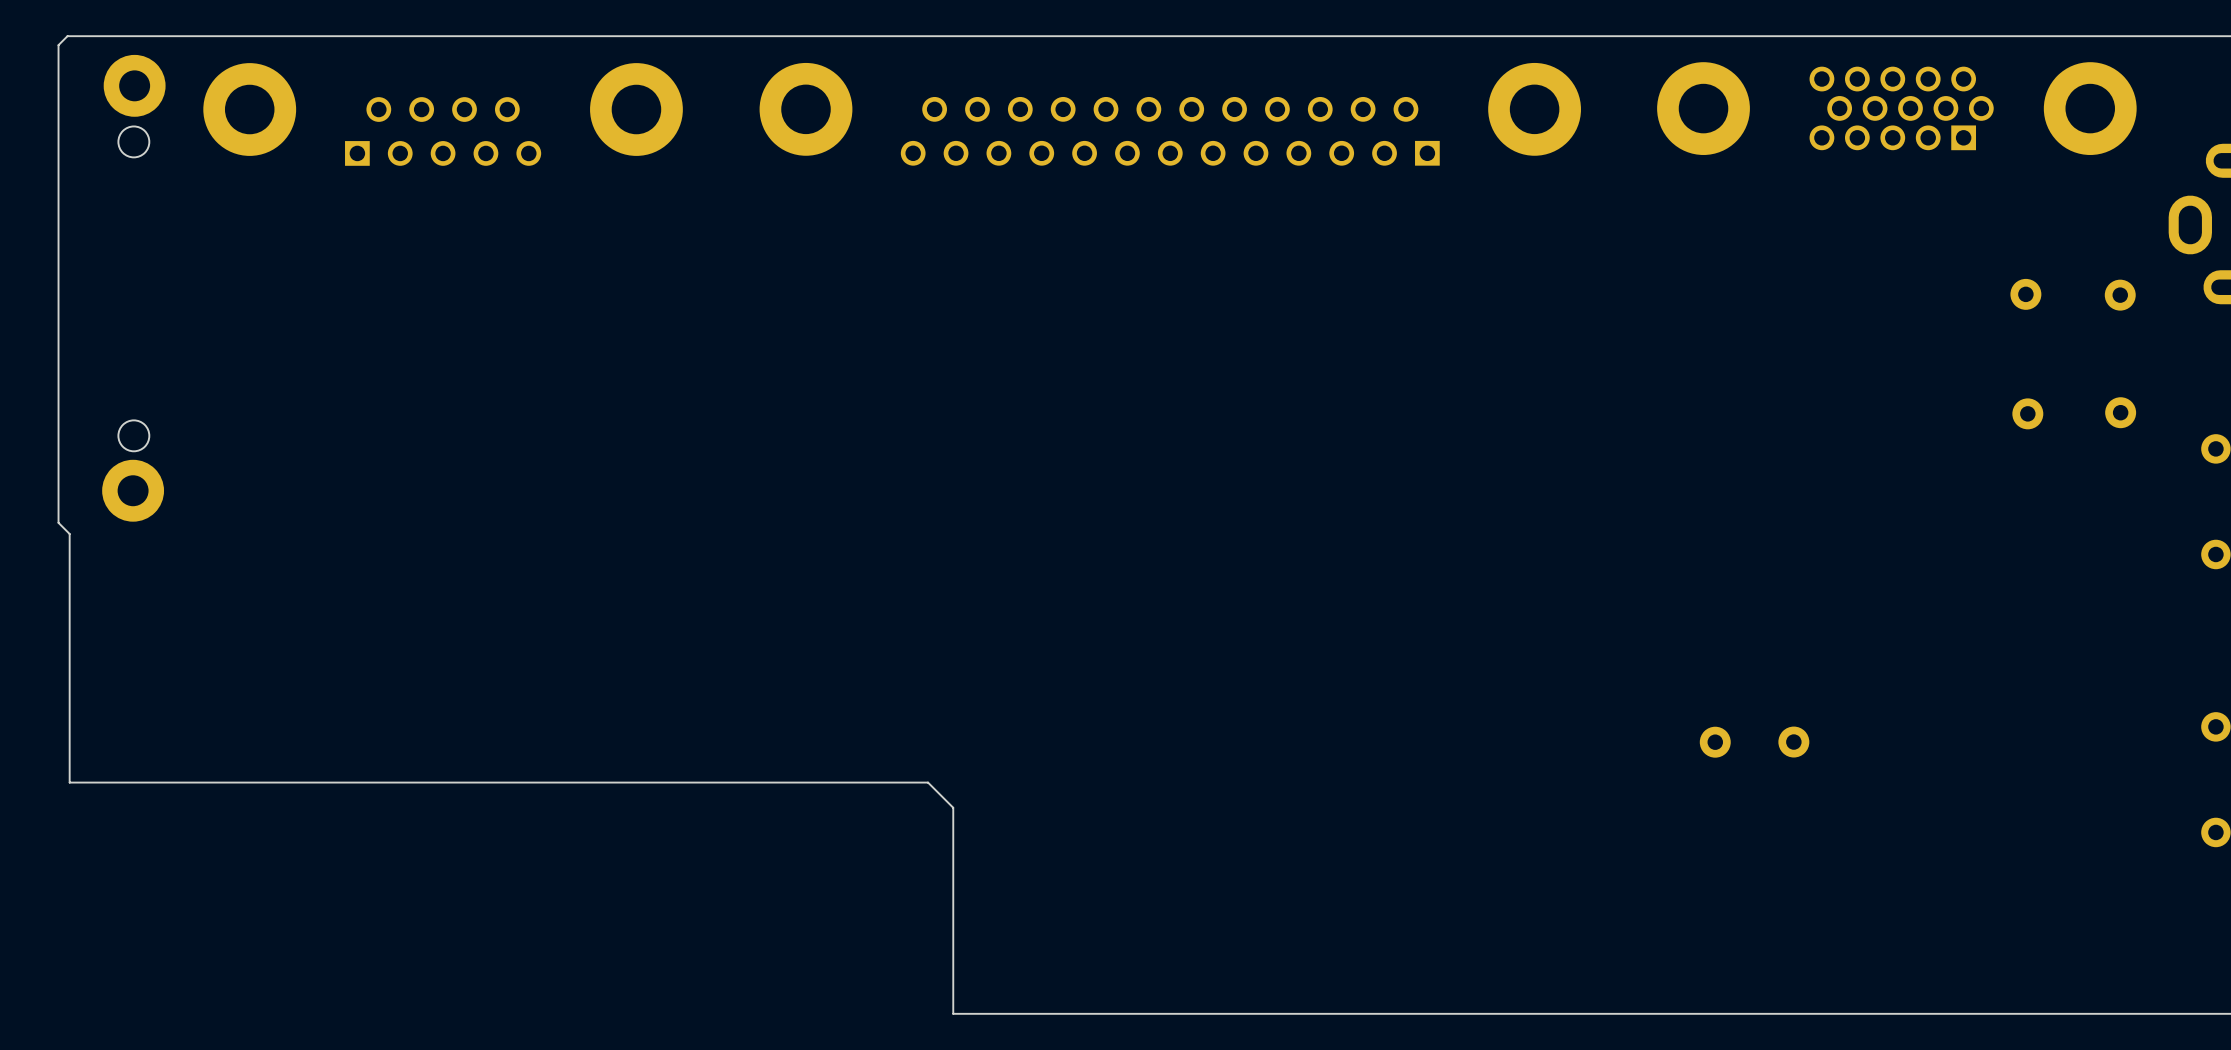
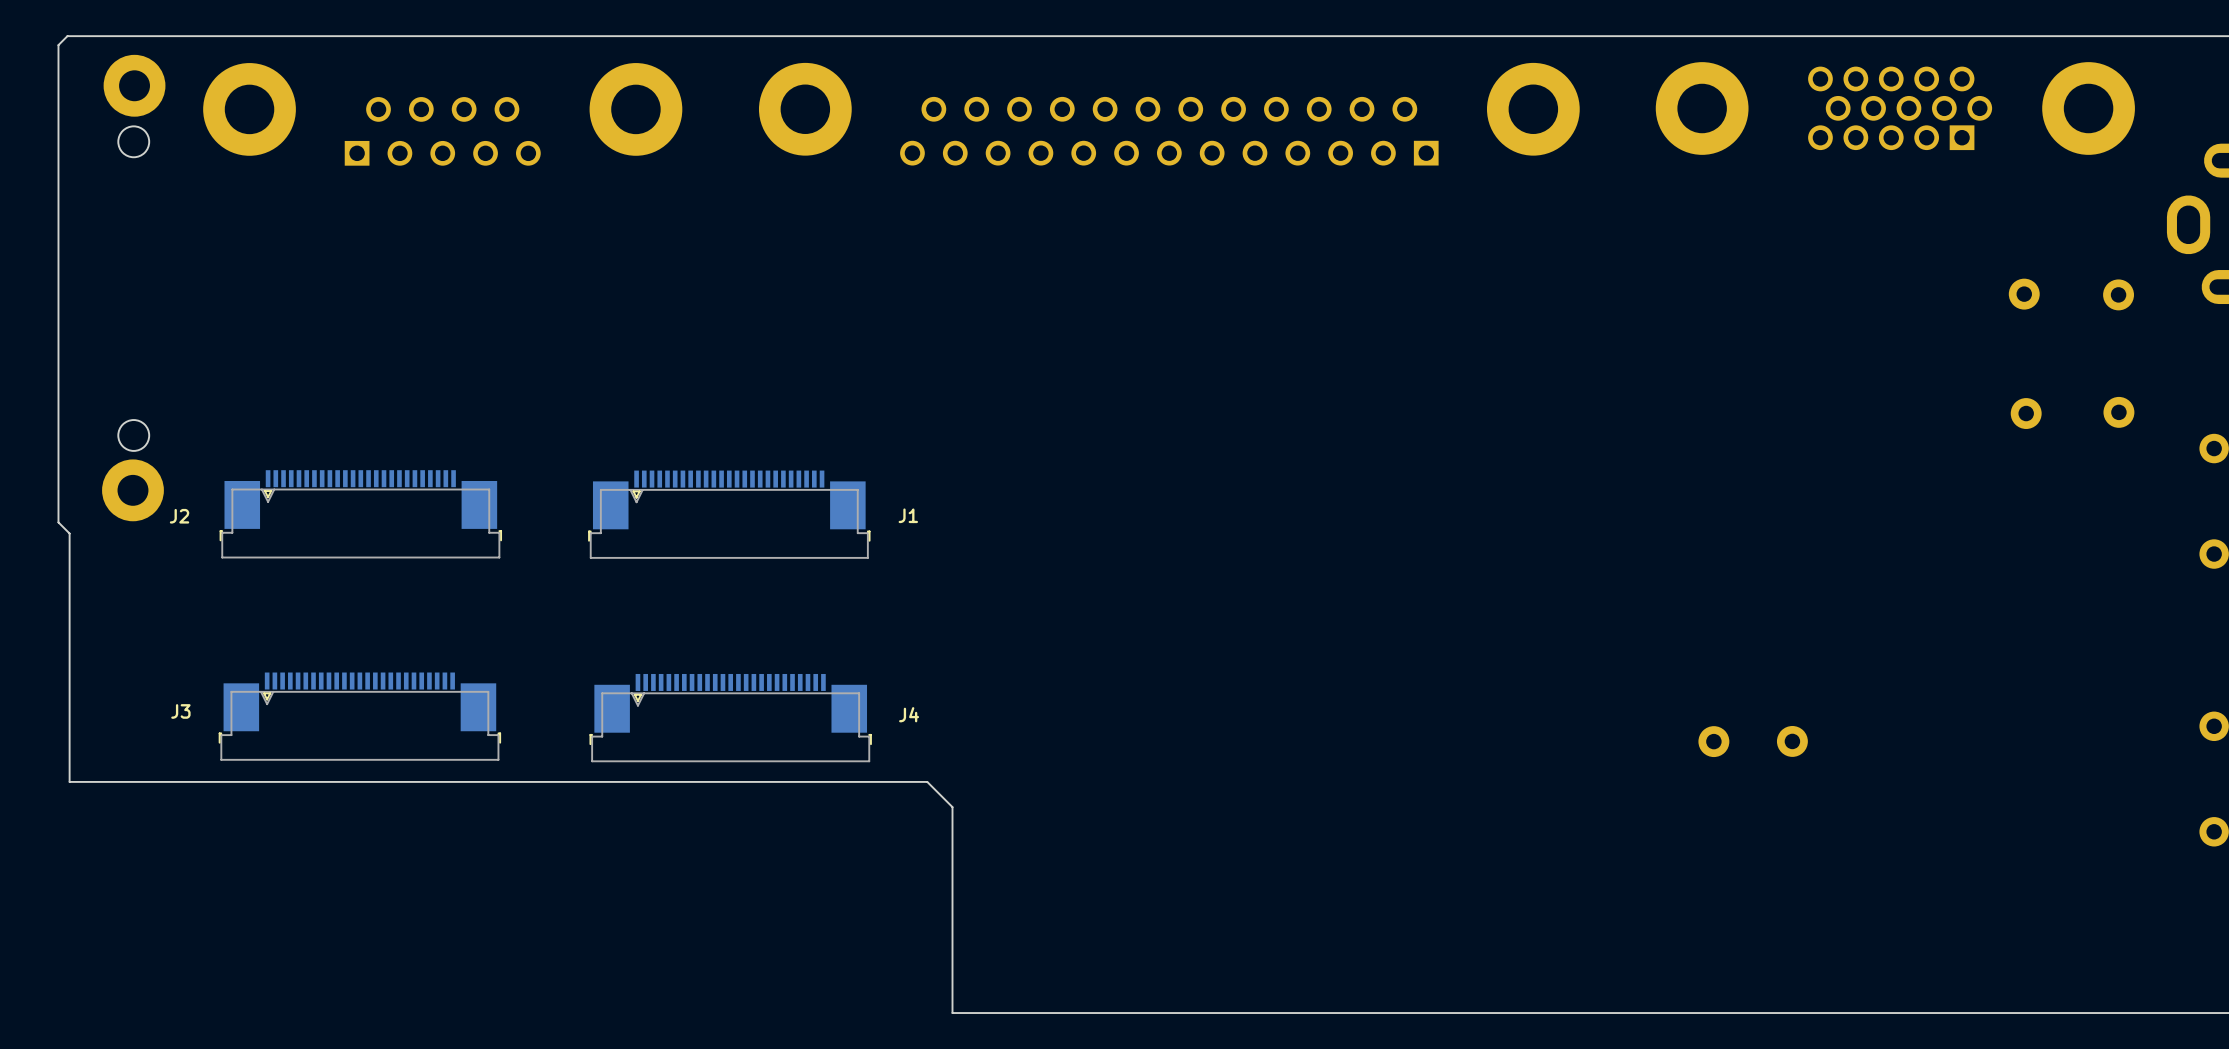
J2: none -> (360, 514)
J1: none -> (729, 514)
J3: none -> (359, 716)
J4: none -> (730, 718)

